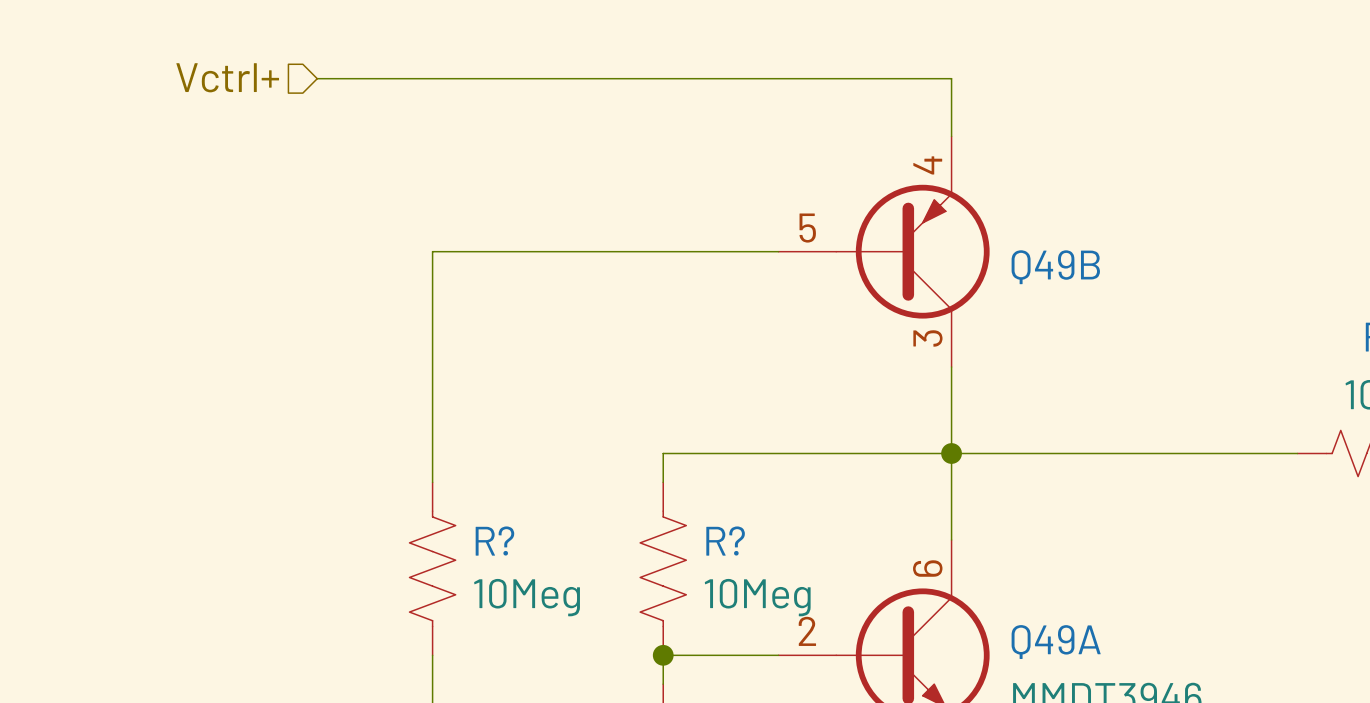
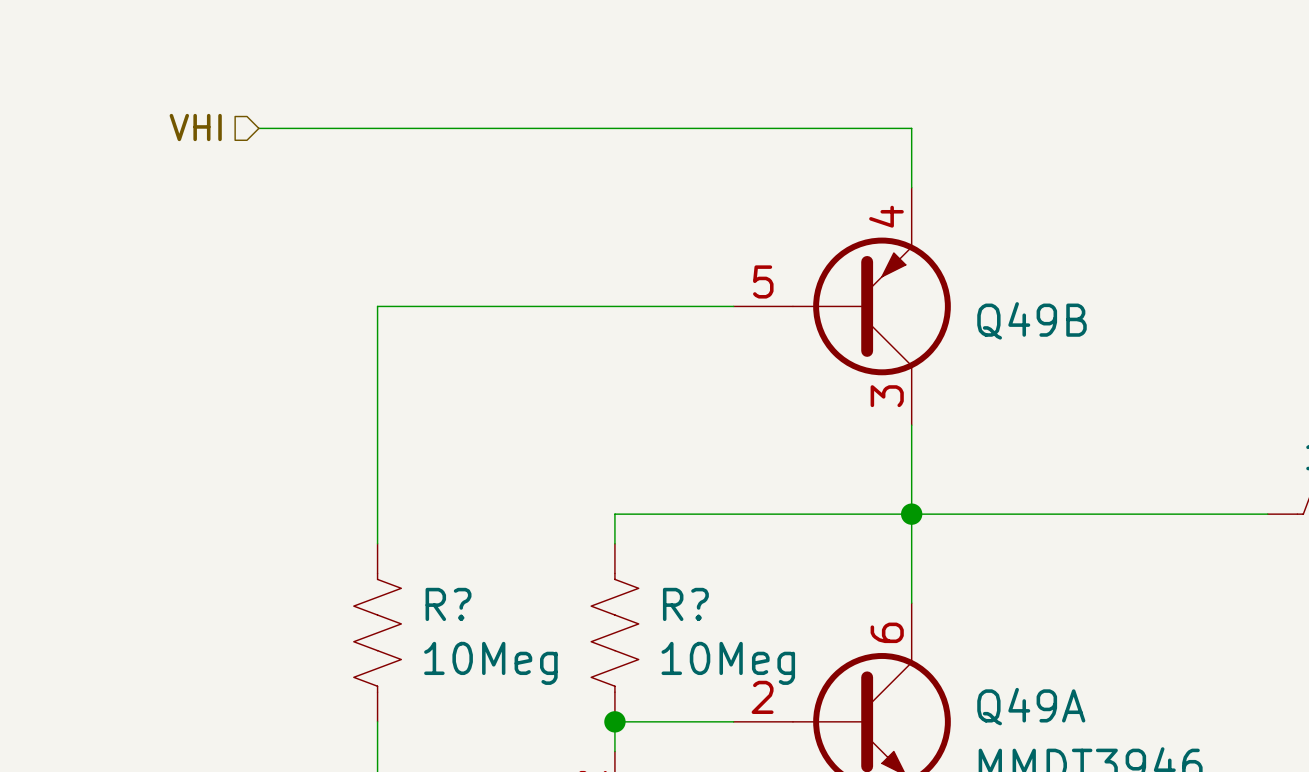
hierarchical label: Vctrl+ (227, 77) -> VHI (195, 127)

